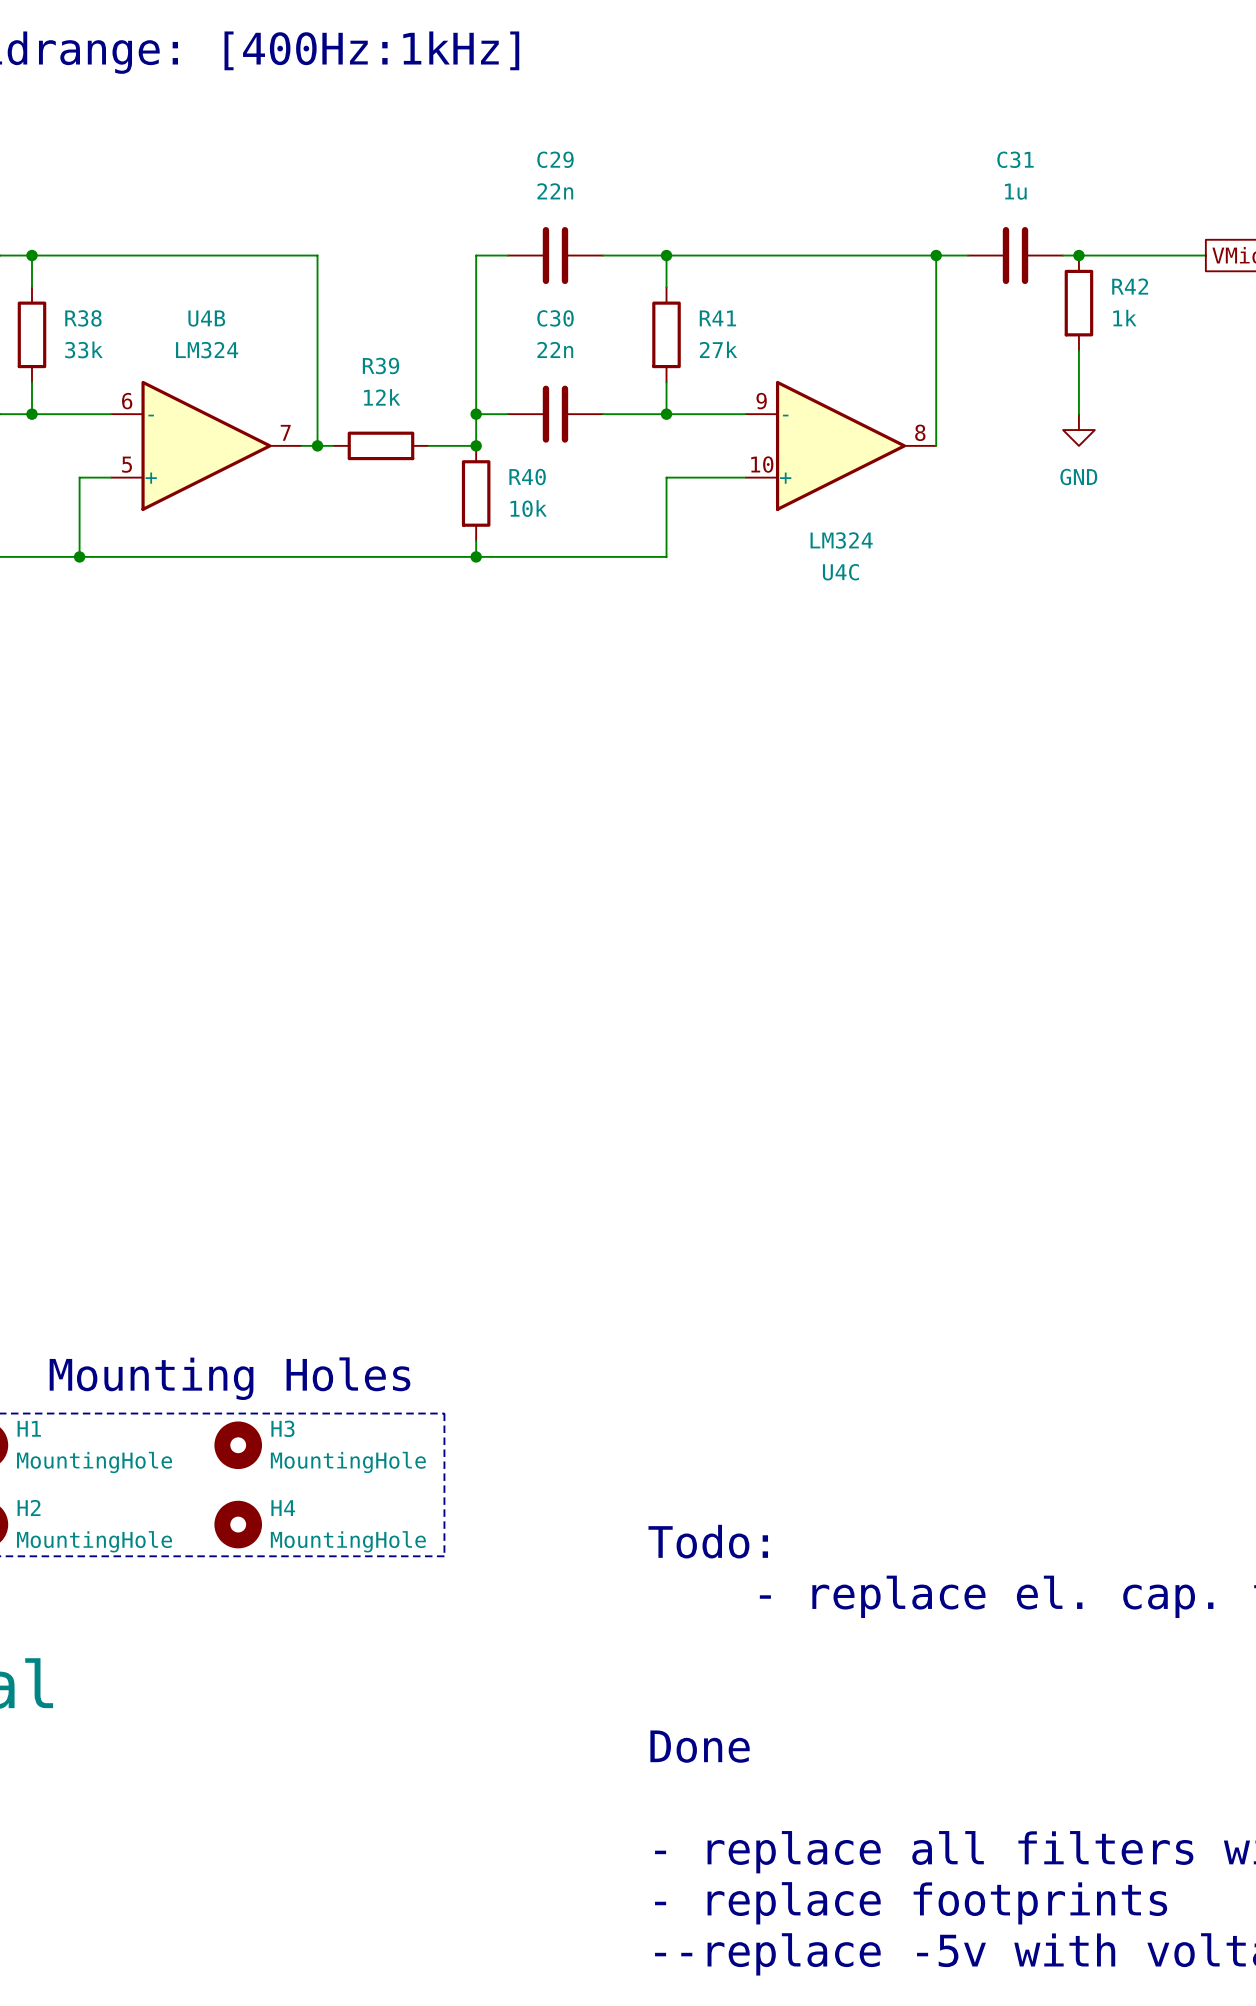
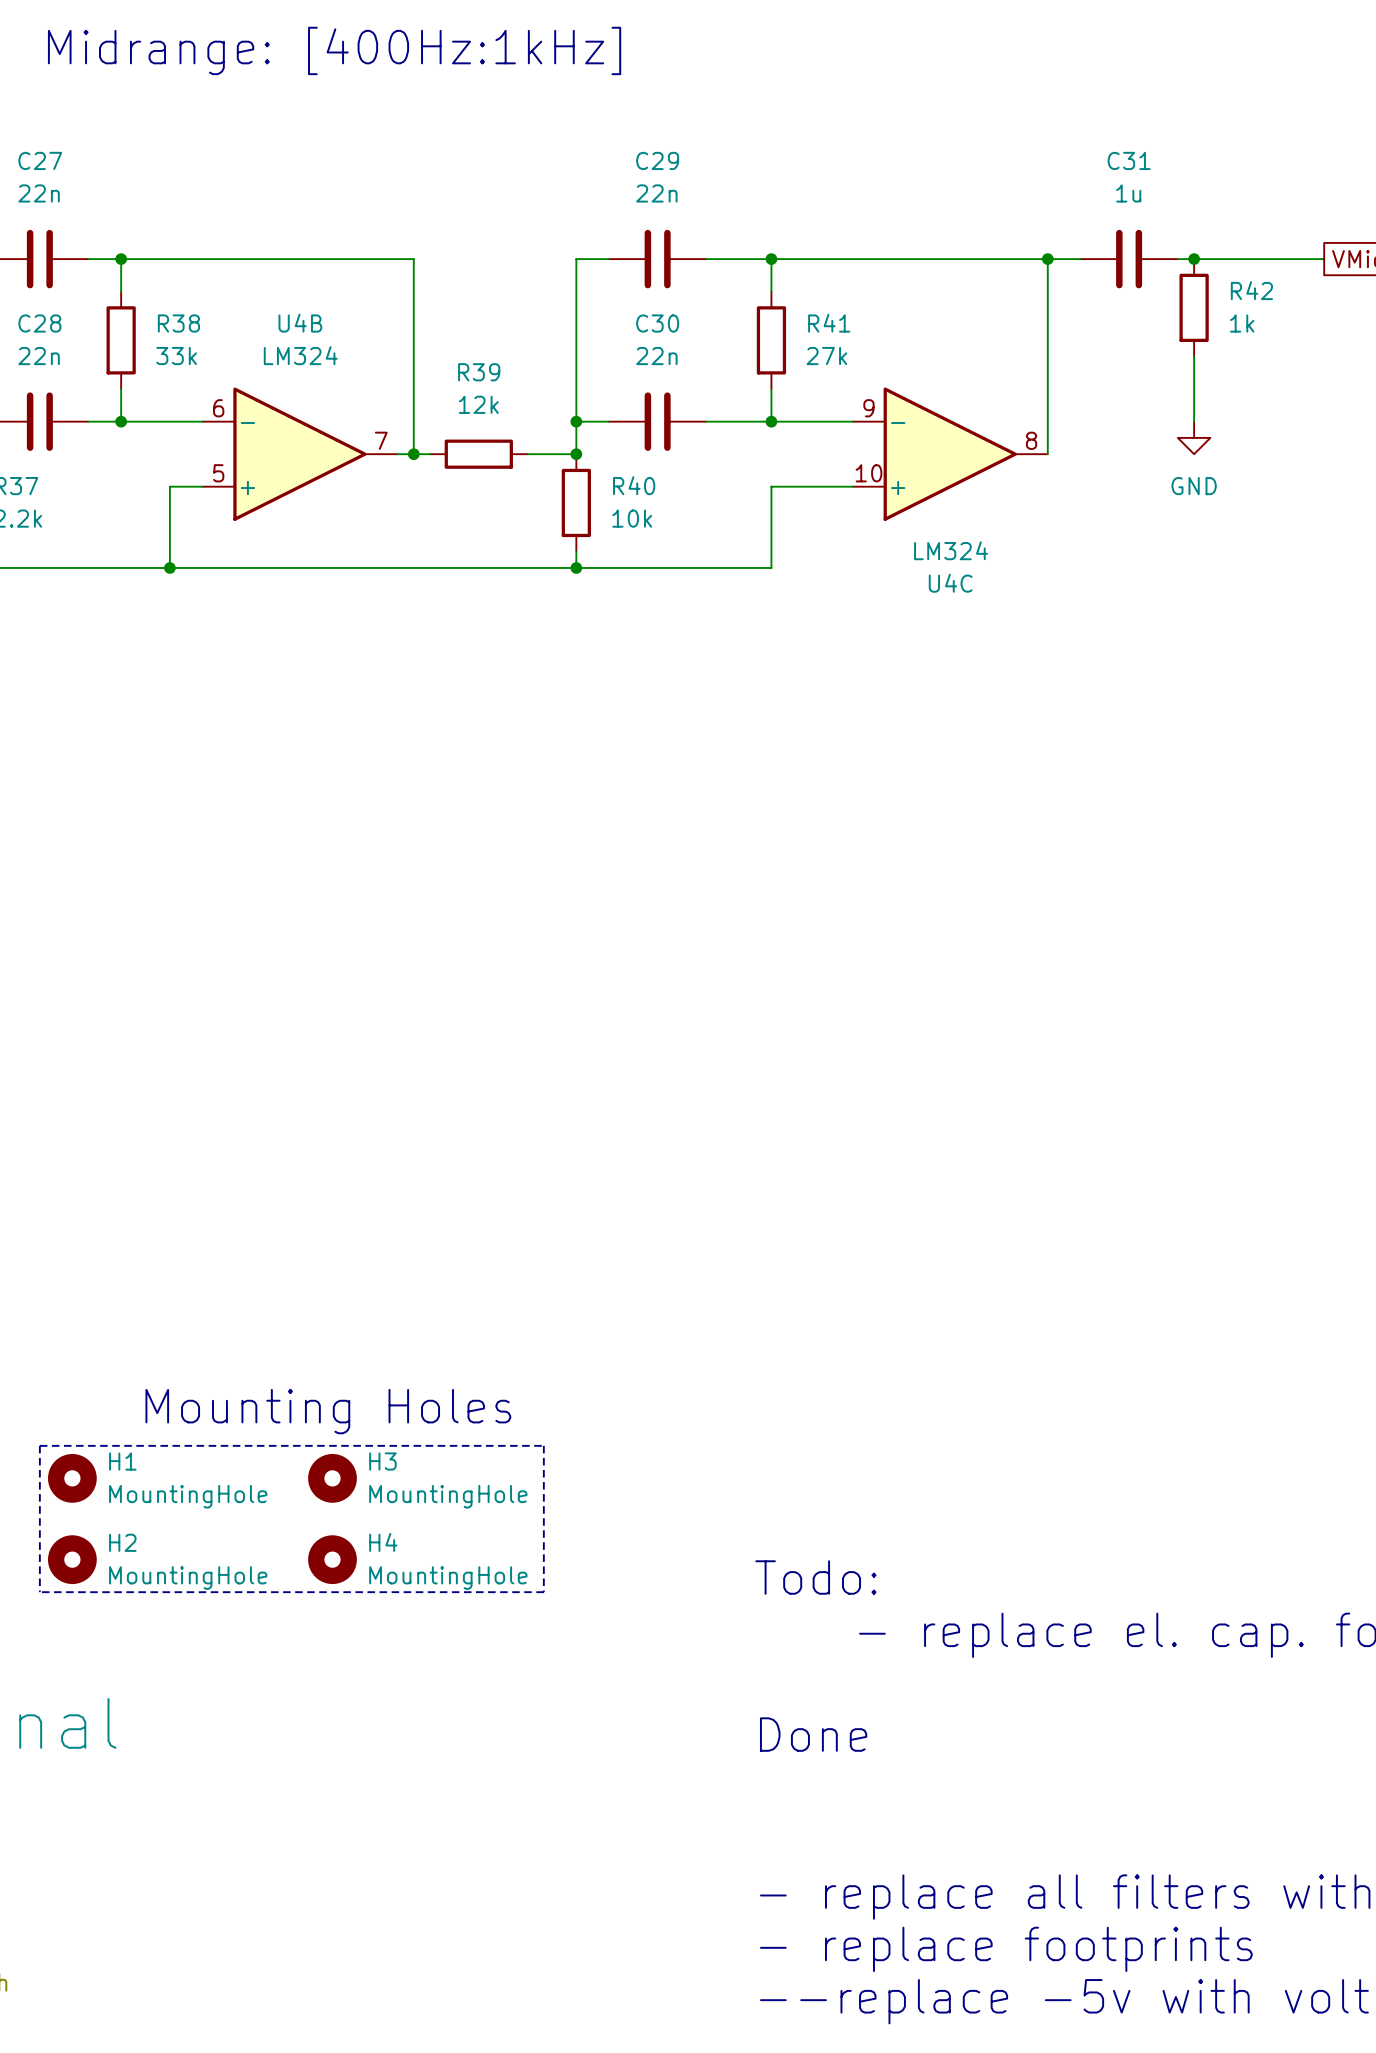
text position: Done (700, 1746) -> Done (813, 1734)

